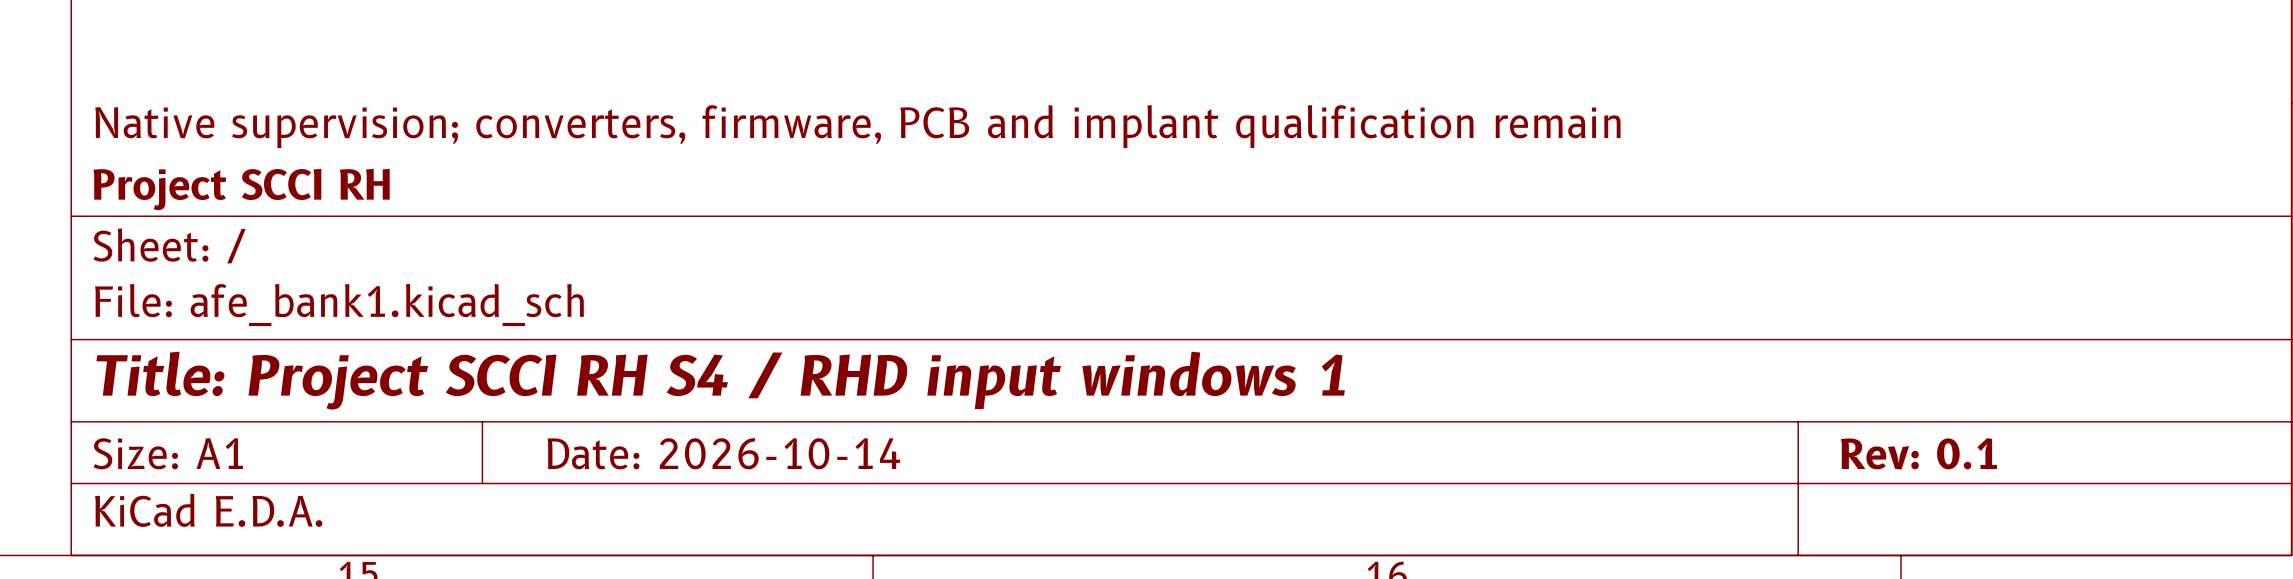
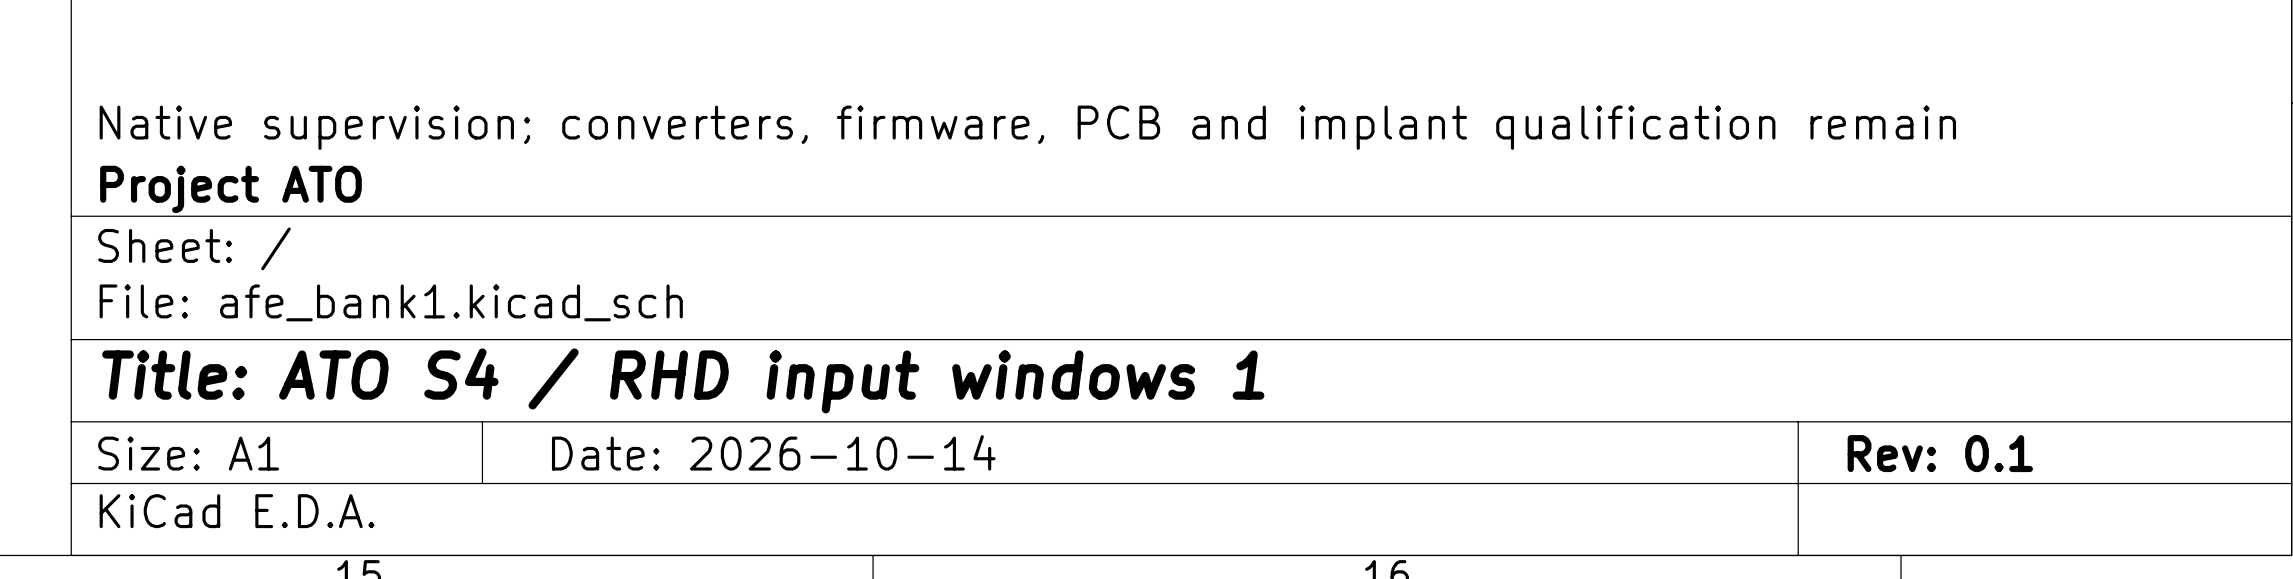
title block: Project SCCI RH (241, 189) -> Project ATO (230, 189)
title block: Title: Project SCCI RH S4 / RHD input windows 1 (720, 380) -> Title: ATO S4 / RHD input windows 1 (683, 380)

